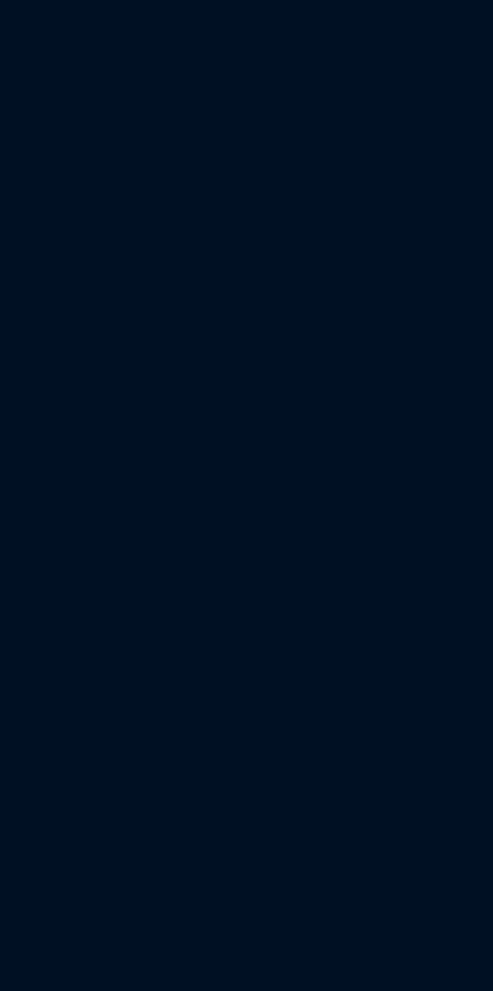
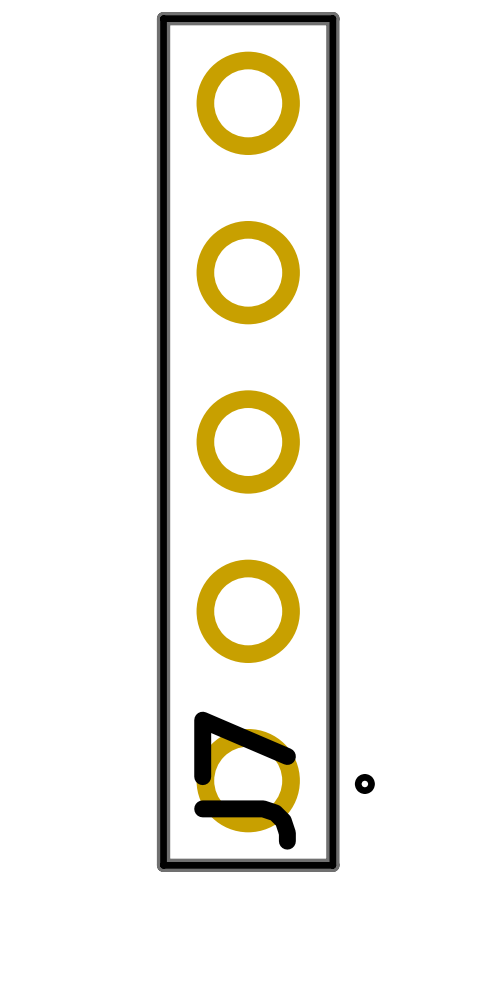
J7: none -> (265, 441)

